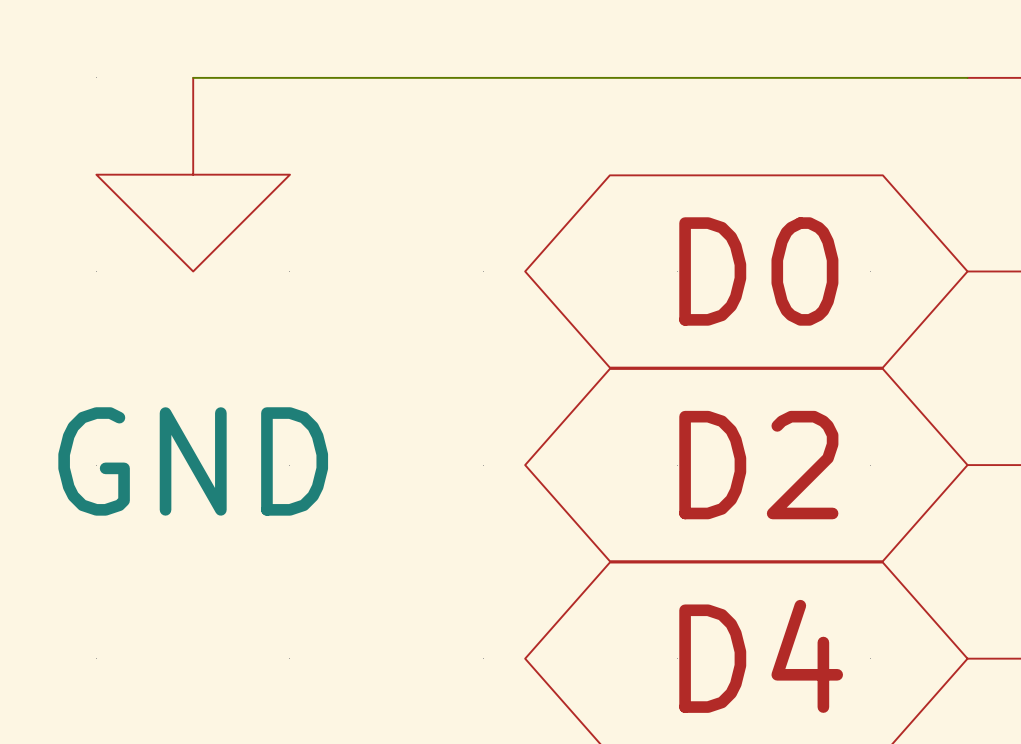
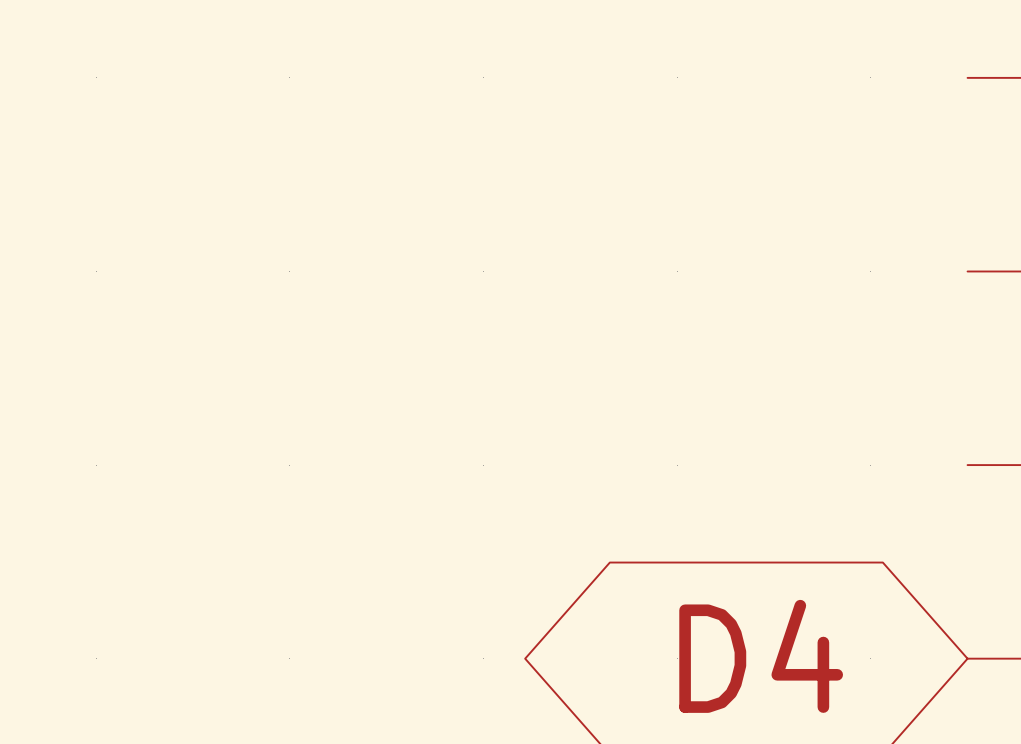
wire: (193, 77) (967, 77) -> none
power symbol: GND (193, 174) -> none
global label: D0 (758, 271) -> none
global label: D2 (758, 465) -> none

